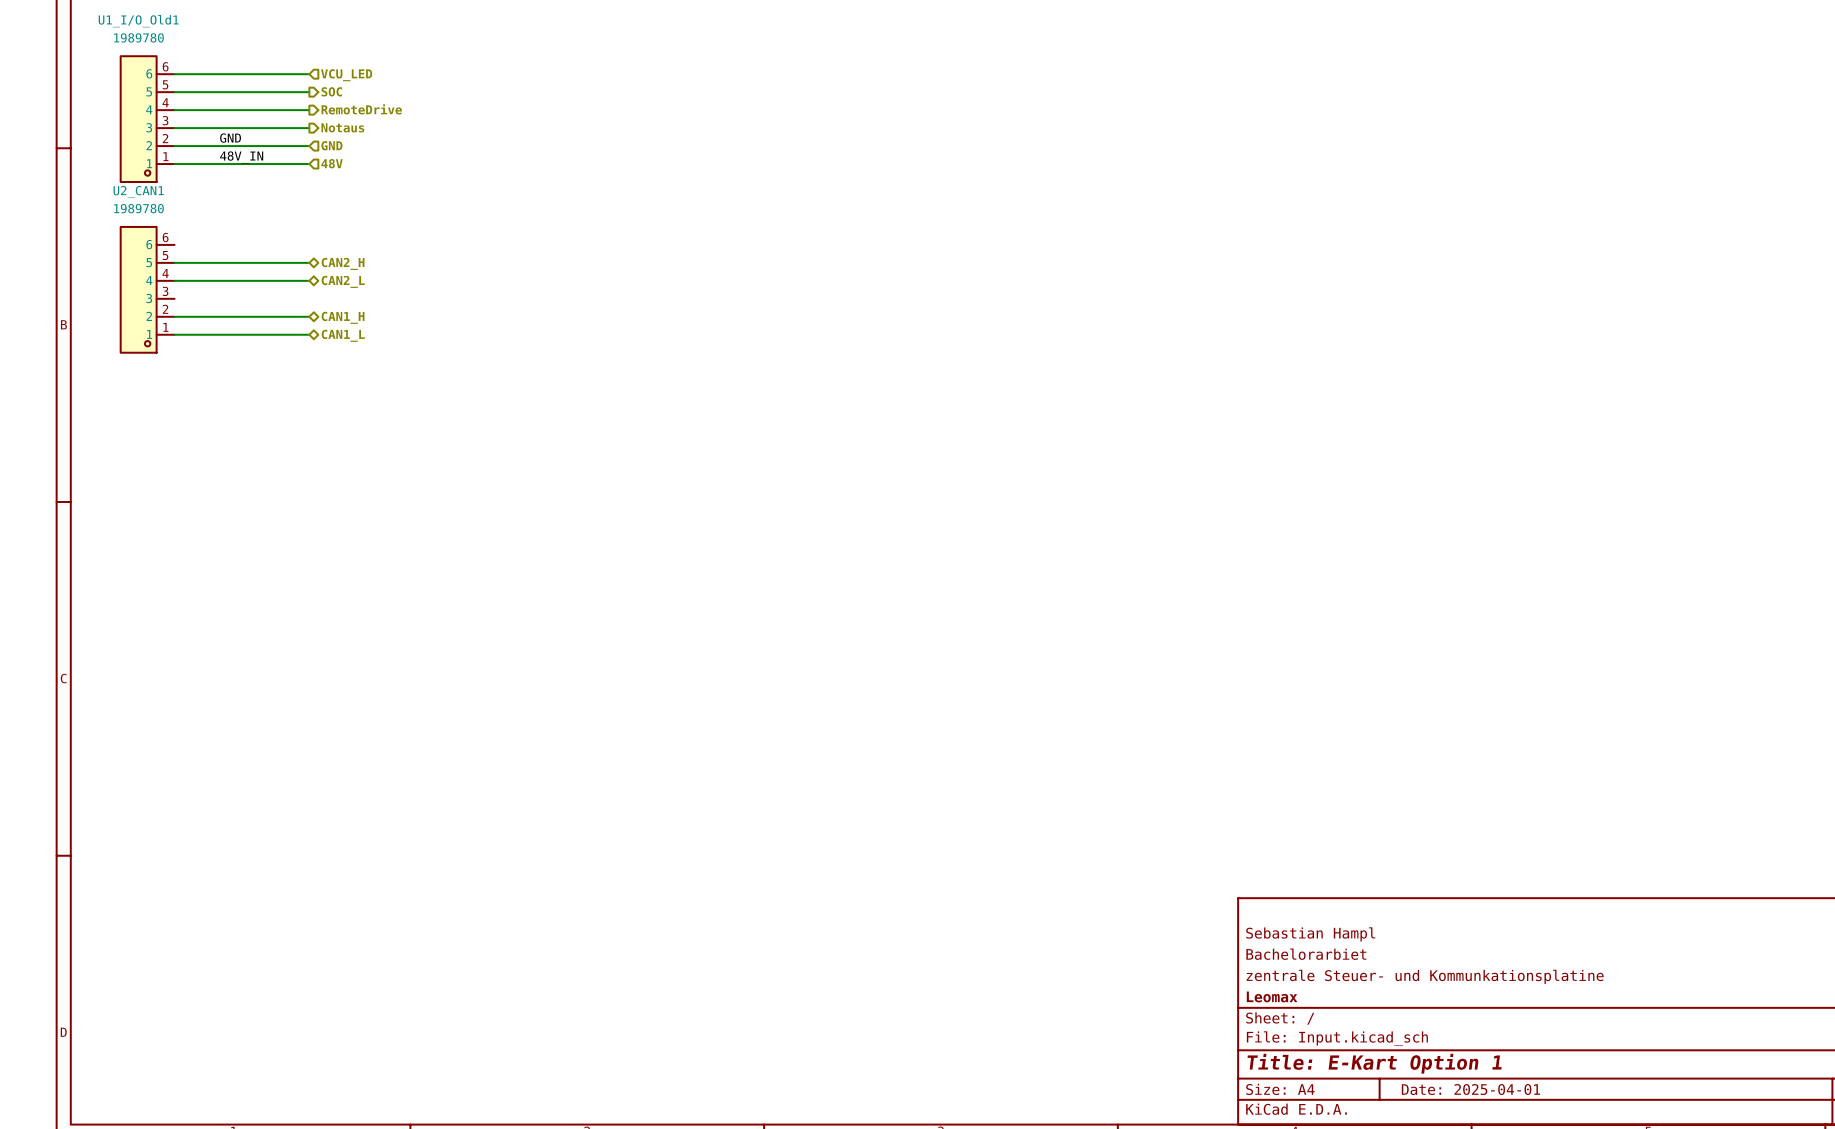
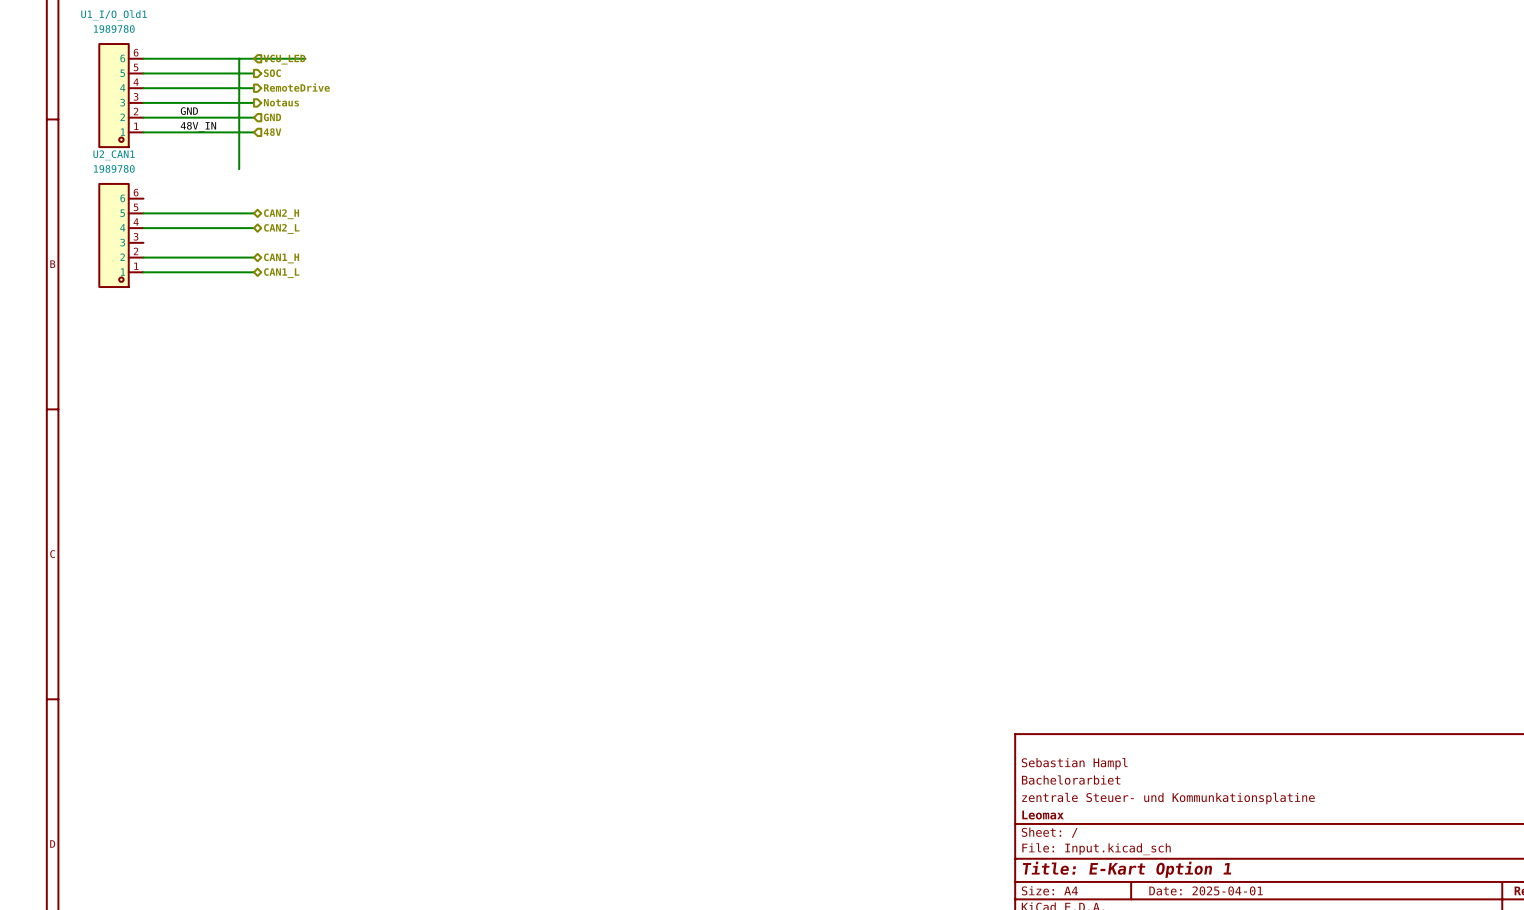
wire: none -> (239, 58) (239, 169)
wire: none -> (253, 58) (305, 58)

